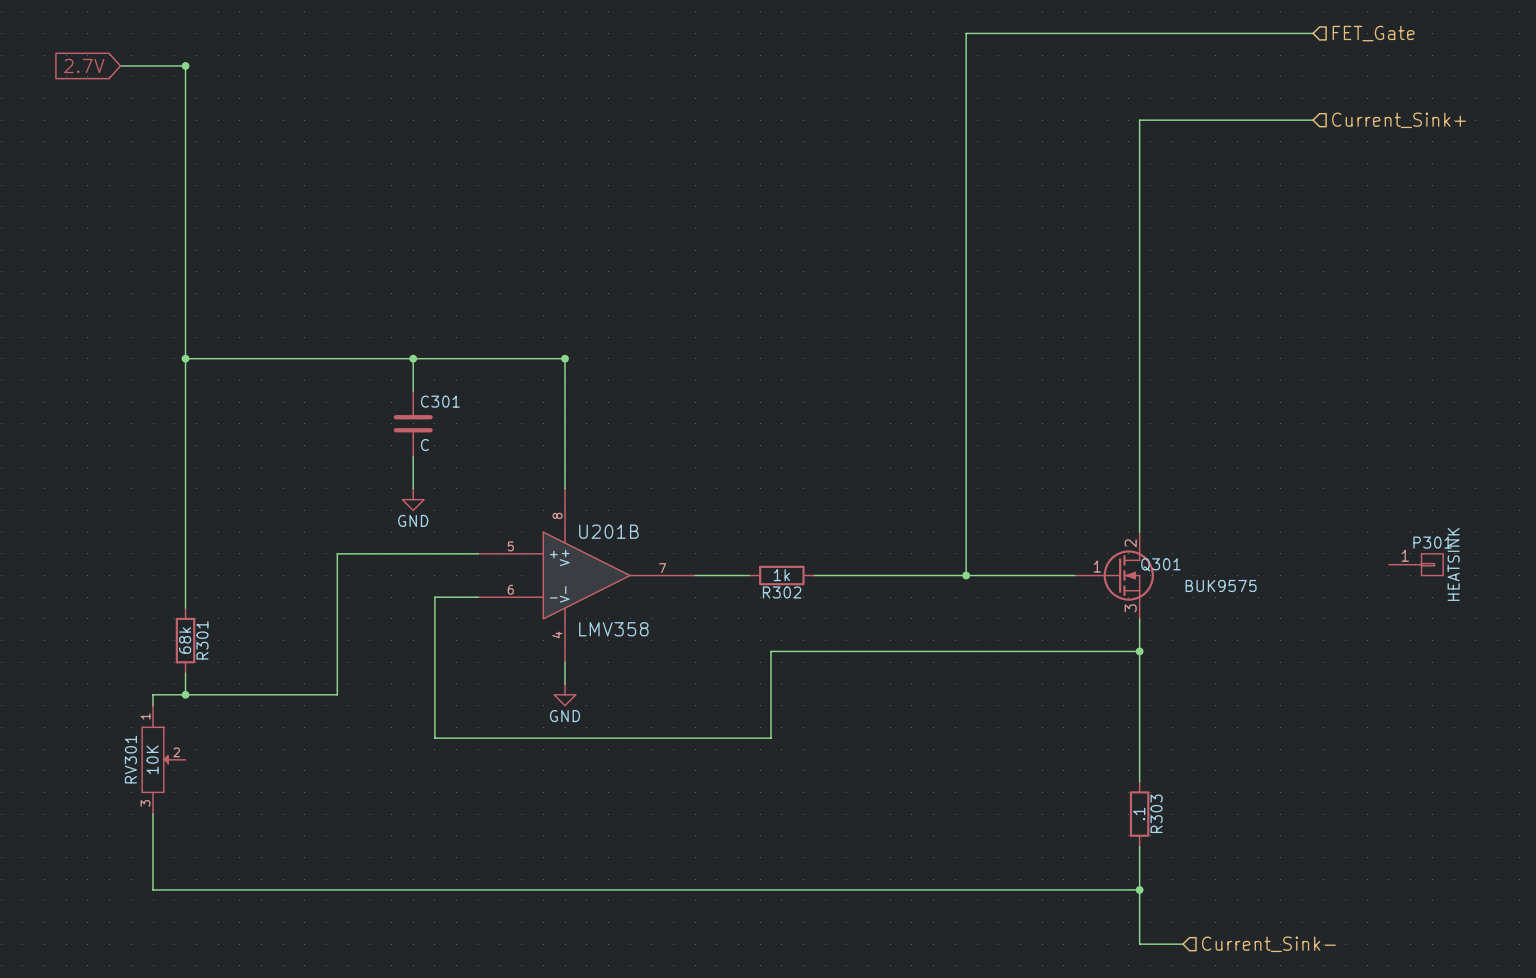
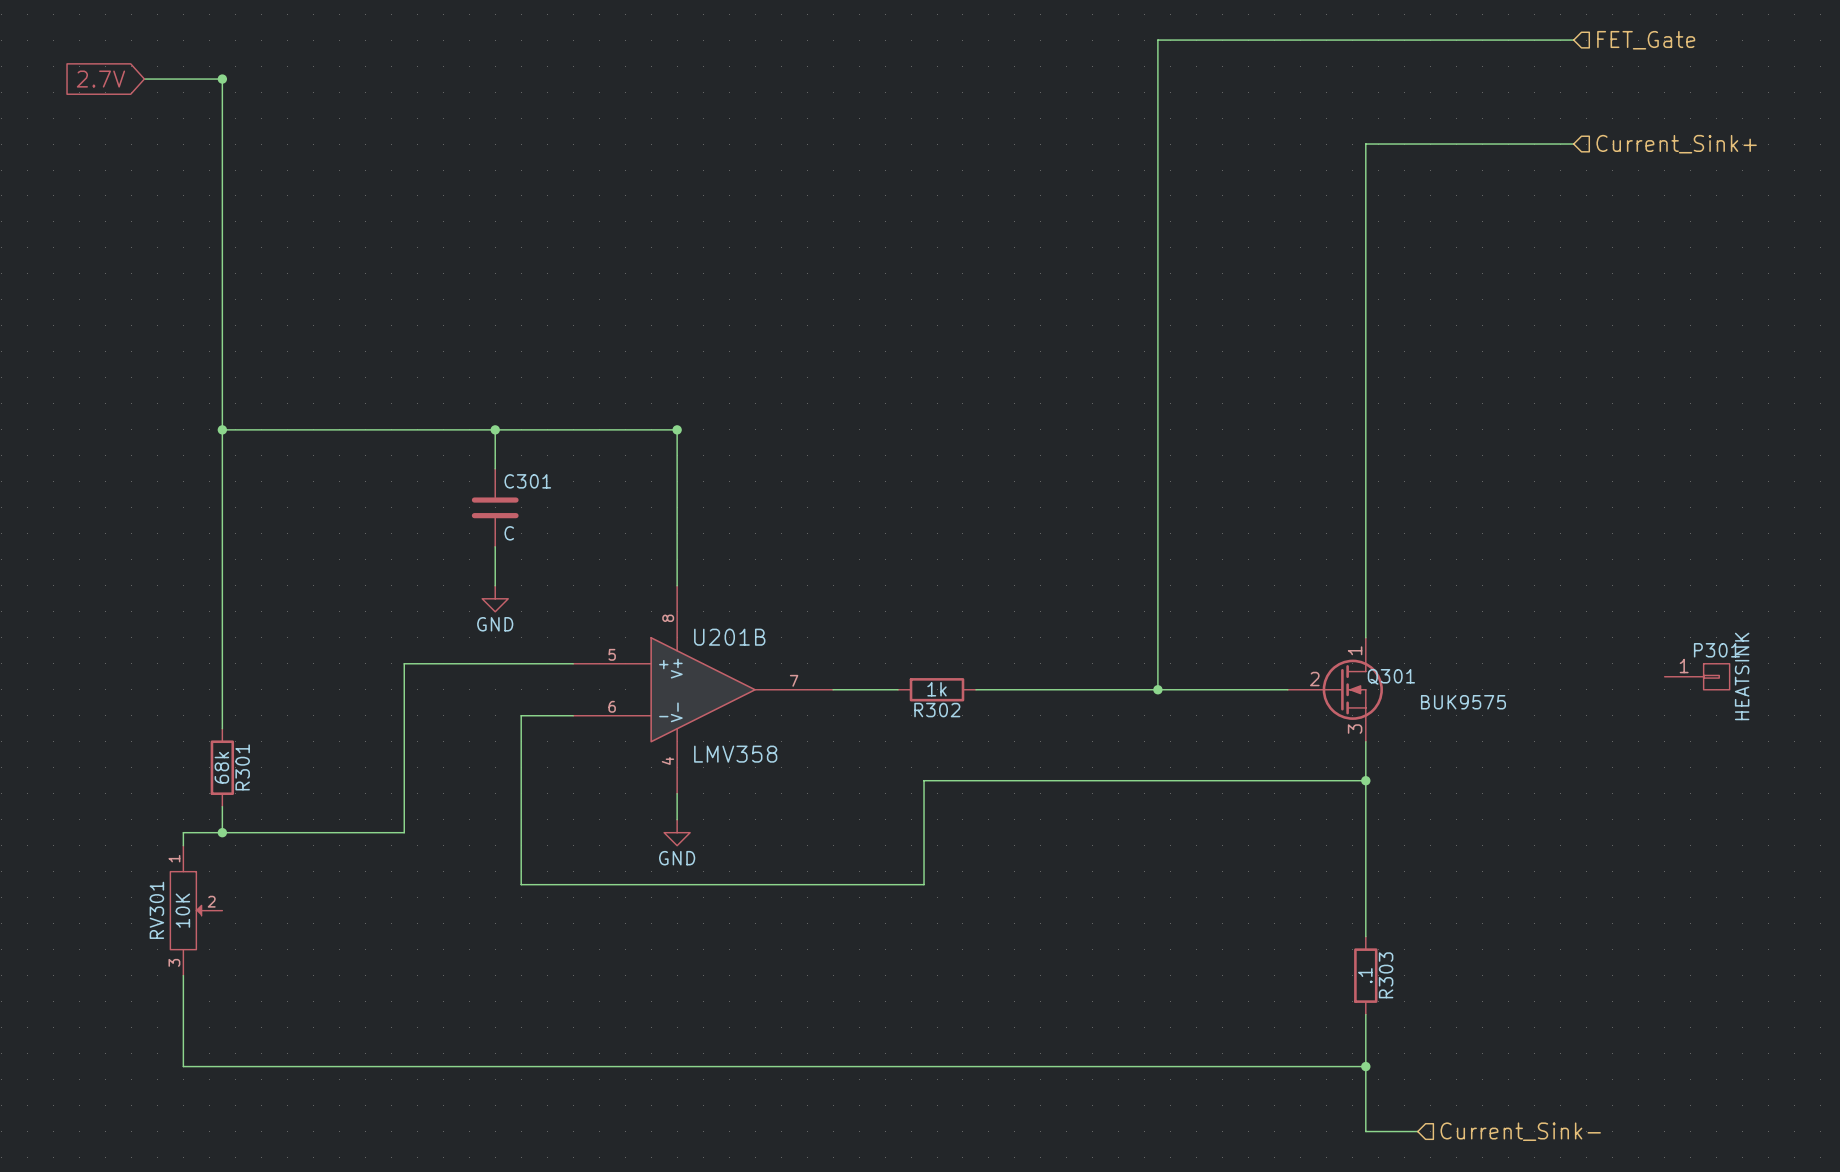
Q301 pin number: 2 (1130, 543) -> 1 (1355, 650)
Q301 pin number: 1 (1097, 566) -> 2 (1314, 679)

